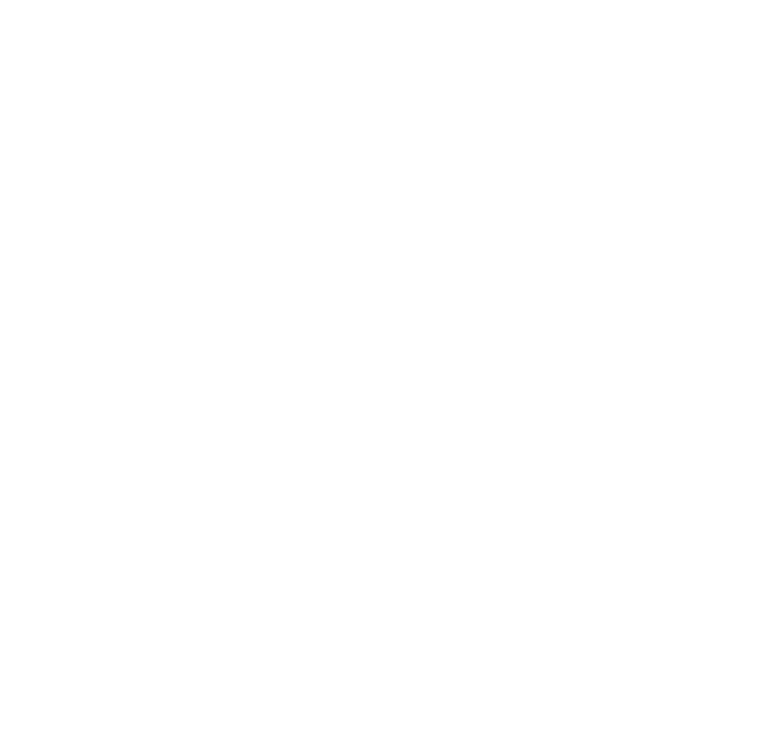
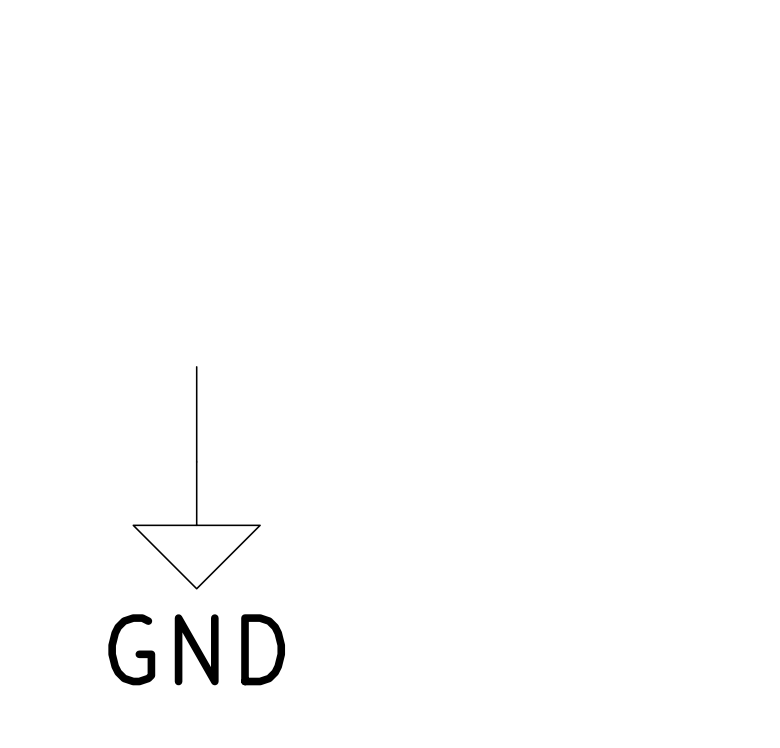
wire: none -> (196, 366) (196, 461)
power symbol: none -> GND (196, 525)

